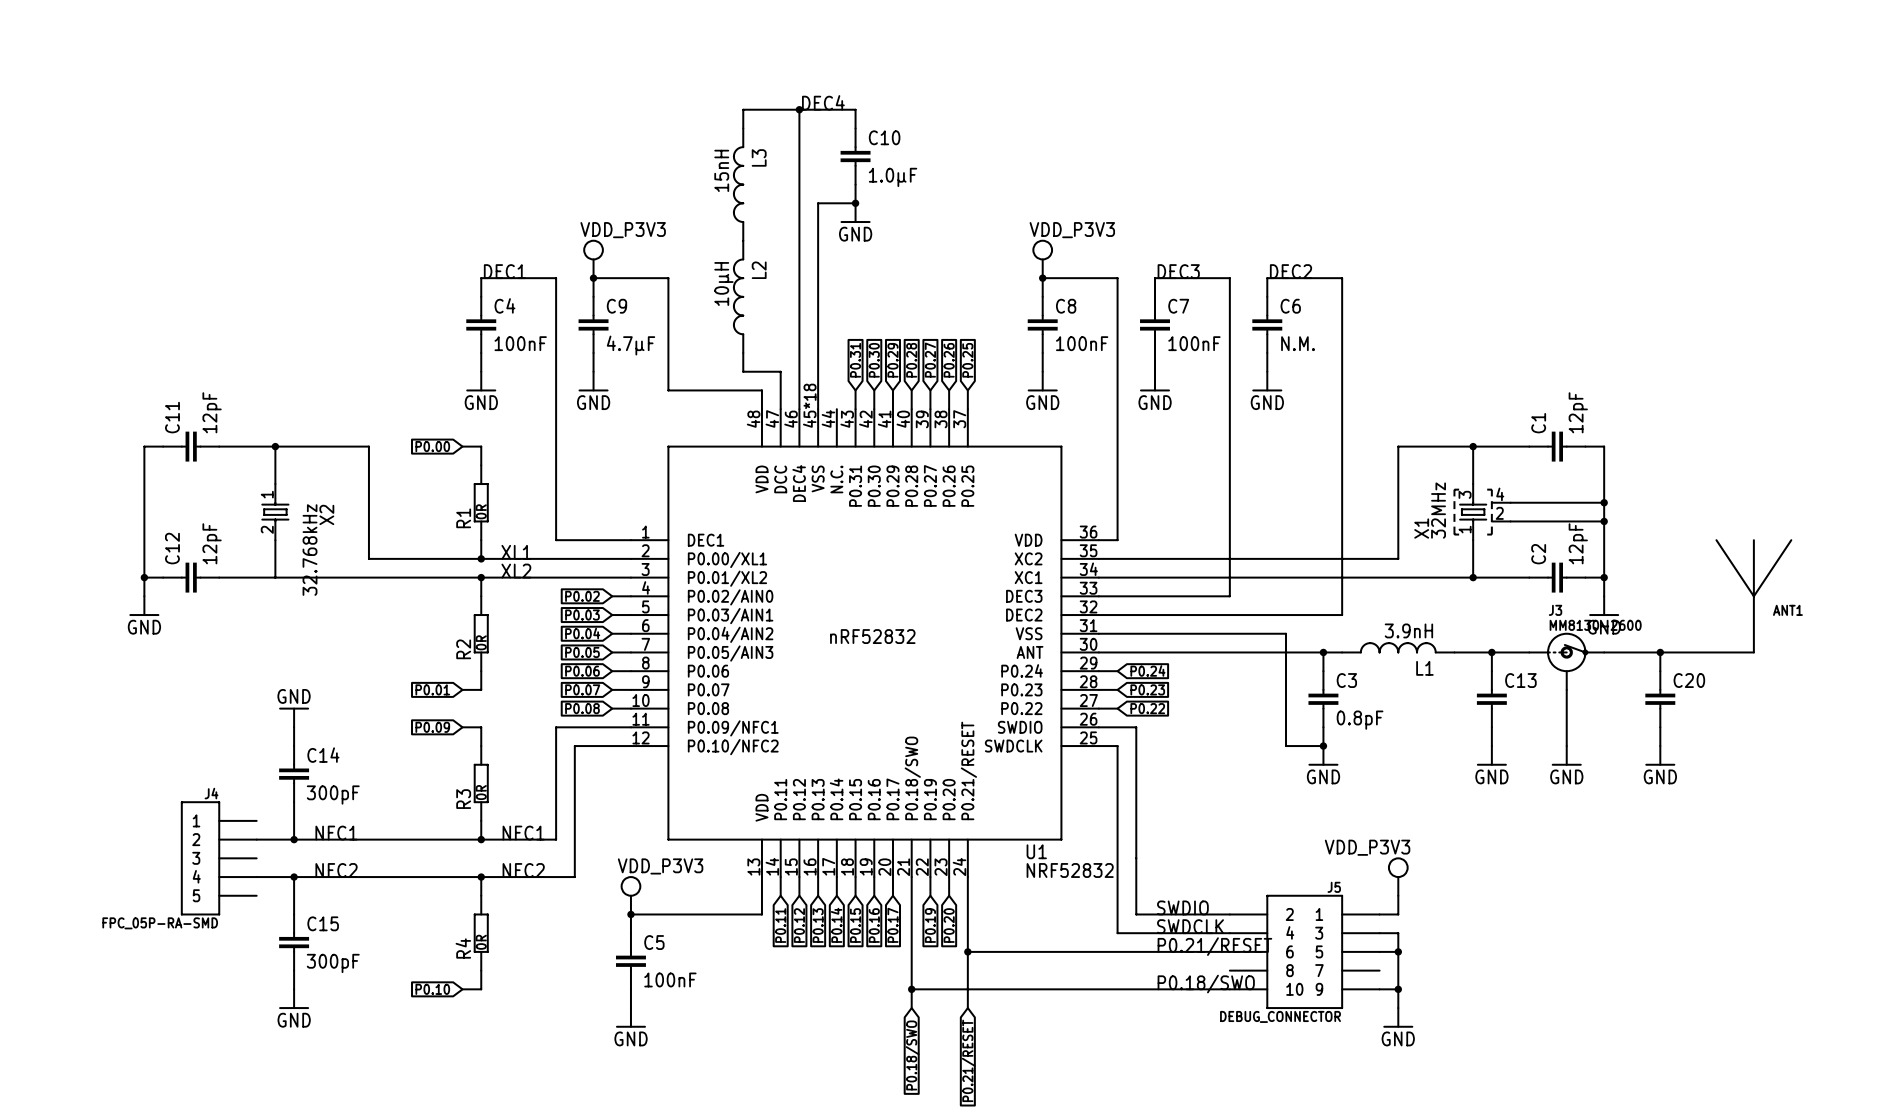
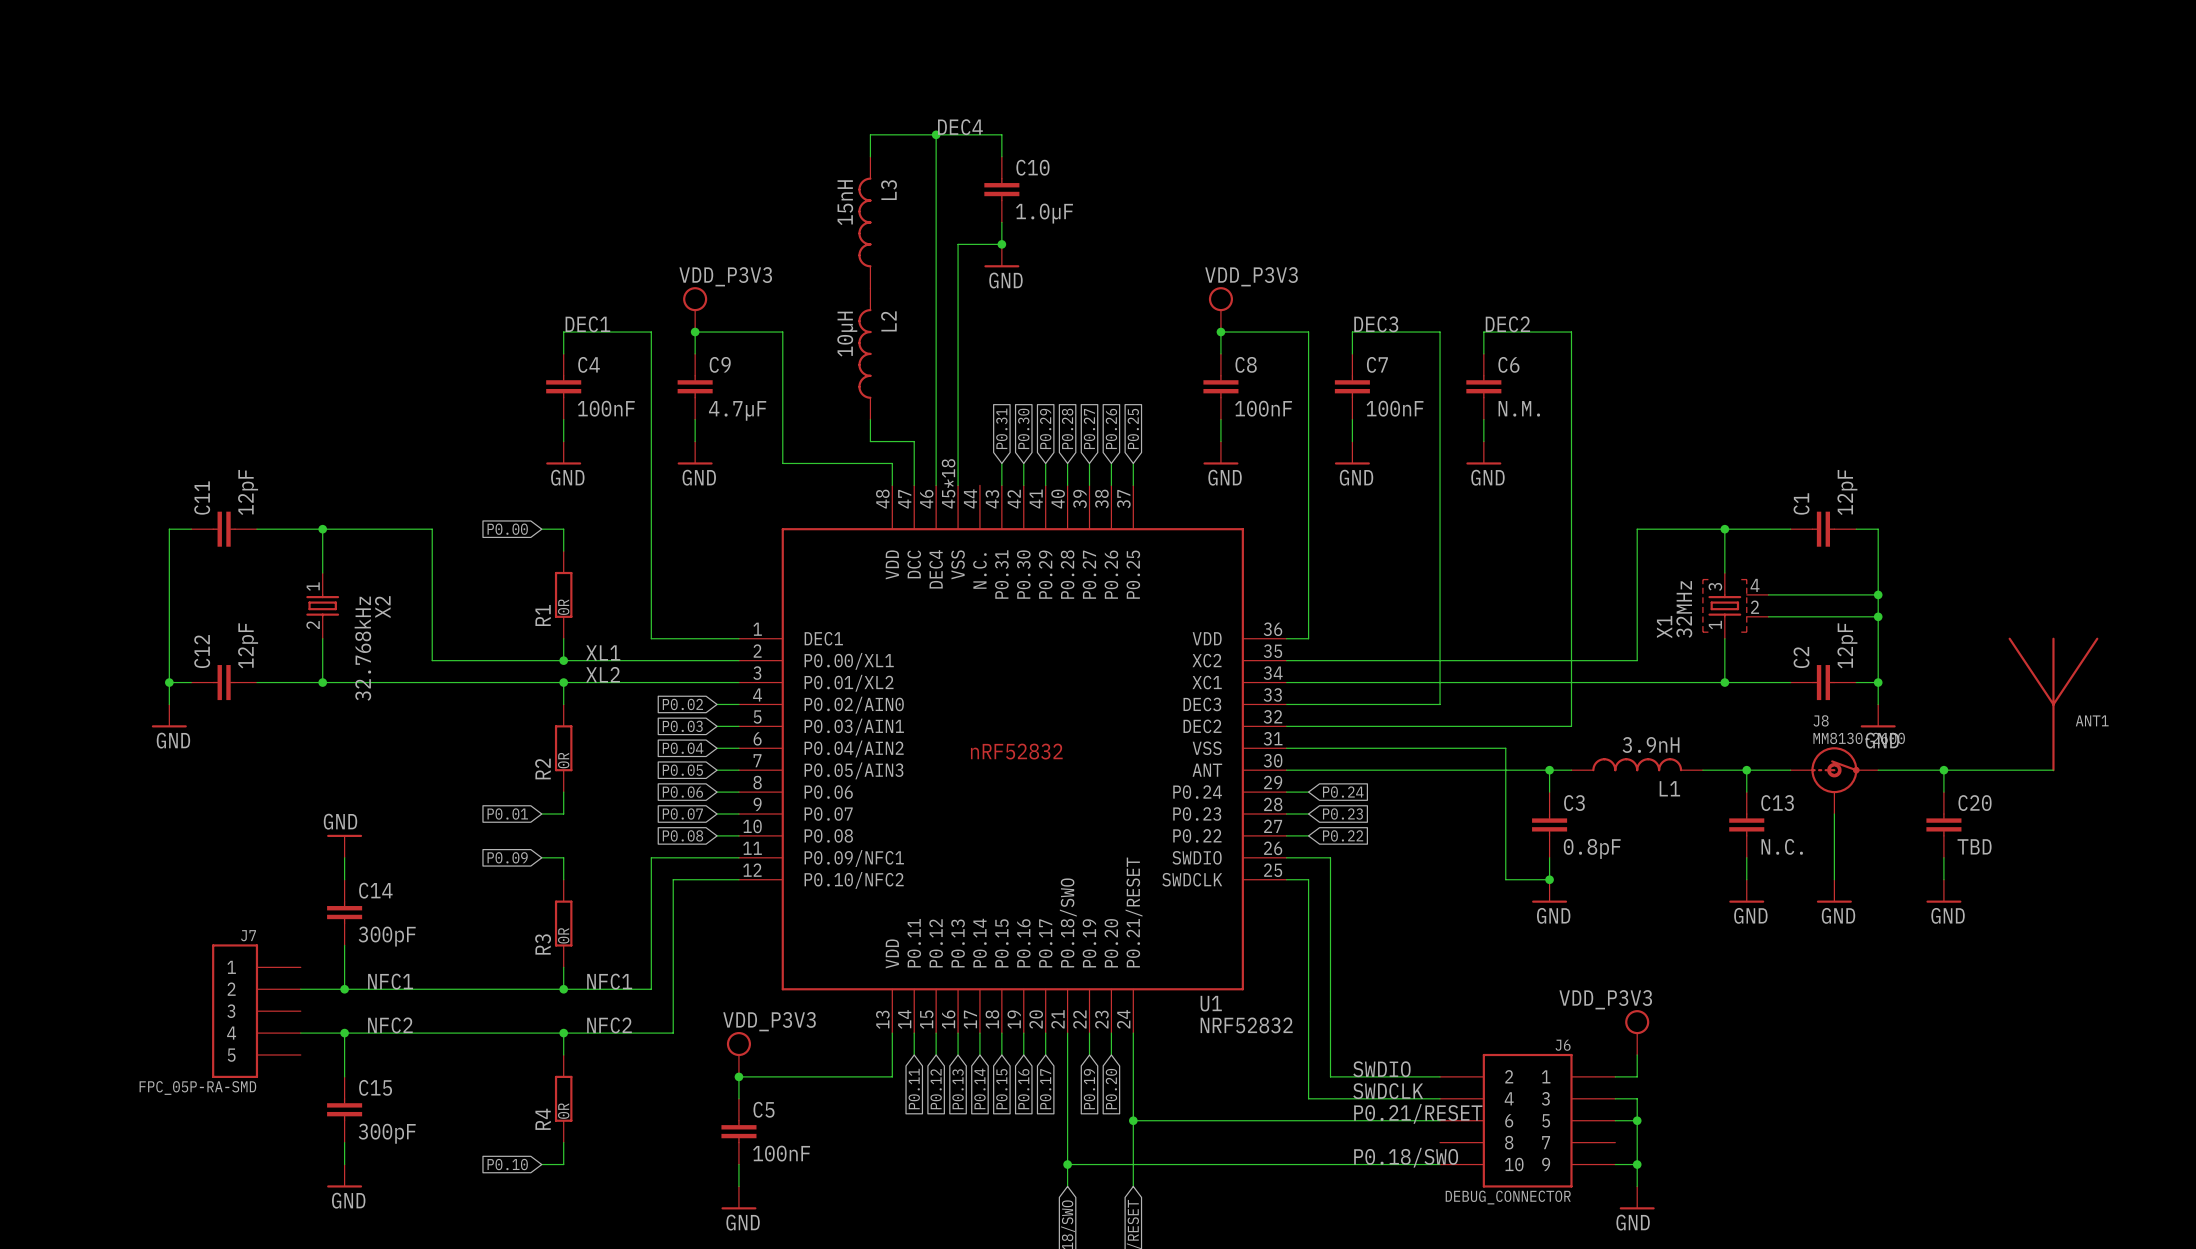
junction: none -> (322, 682)
J3 name: J3 (1555, 610) -> J8 (1821, 720)
C13 value: none -> N.C. (1782, 846)
C20 value: none -> TBD (1974, 846)
J4 name: J4 (211, 793) -> J7 (248, 935)
J5 name: J5 (1334, 887) -> J6 (1563, 1045)

